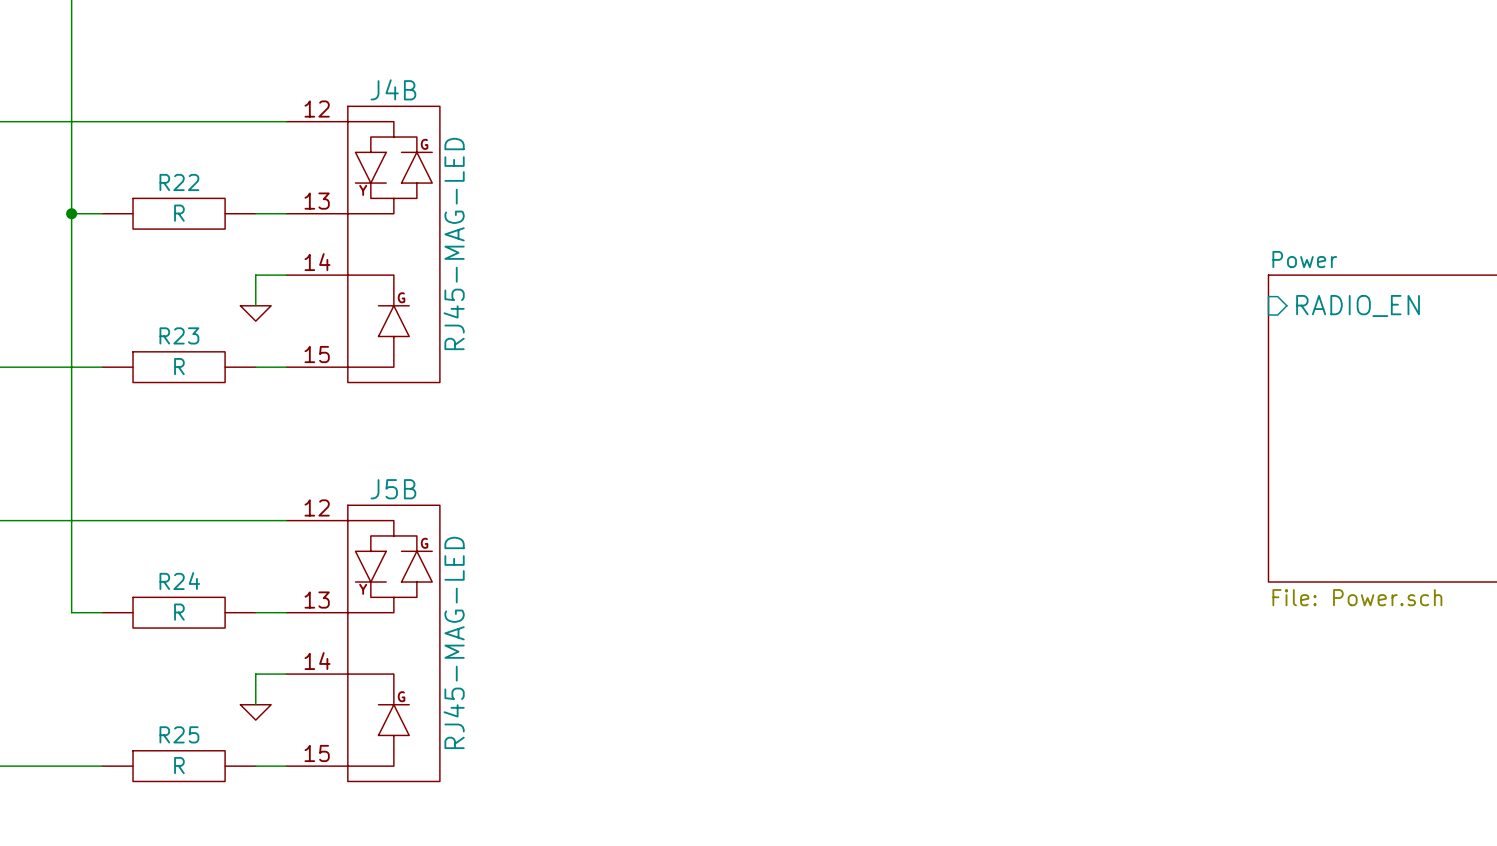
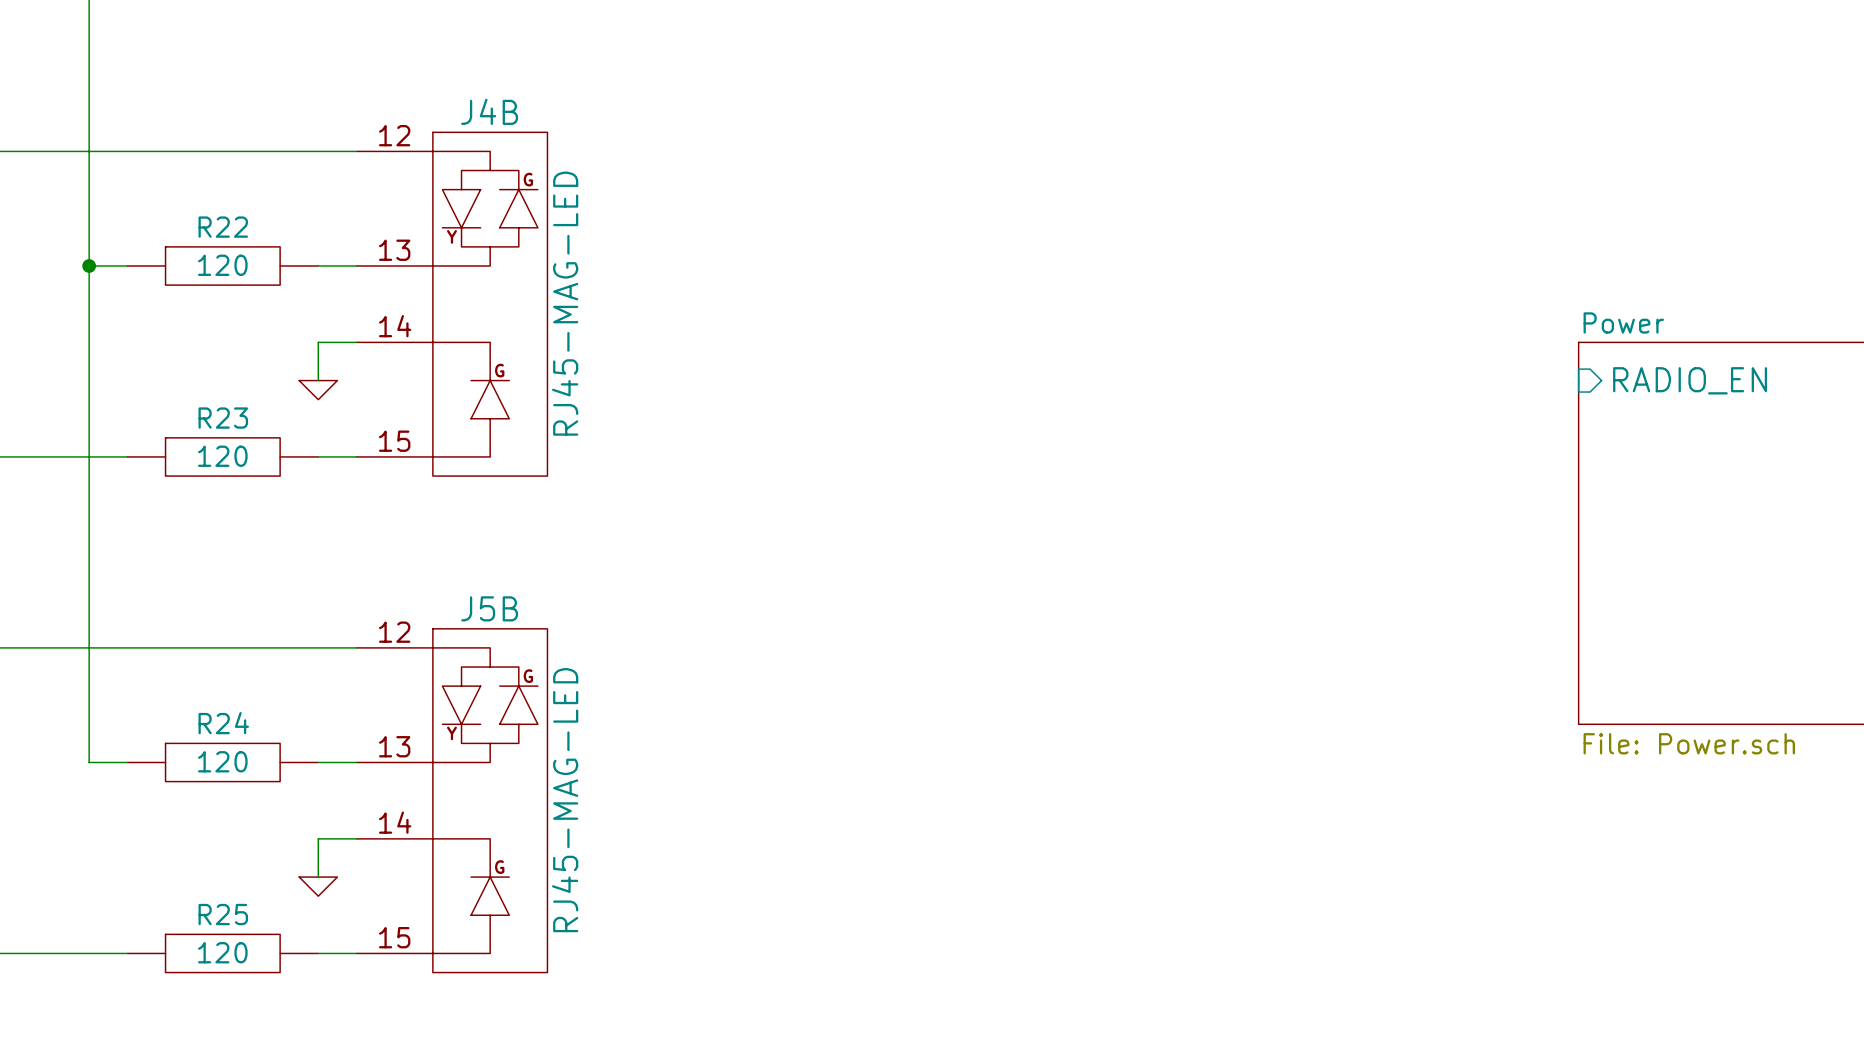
R22 value: R (179, 213) -> 120 (222, 265)
R23 value: R (179, 366) -> 120 (222, 456)
R24 value: R (179, 612) -> 120 (222, 761)
R25 value: R (179, 765) -> 120 (222, 952)

